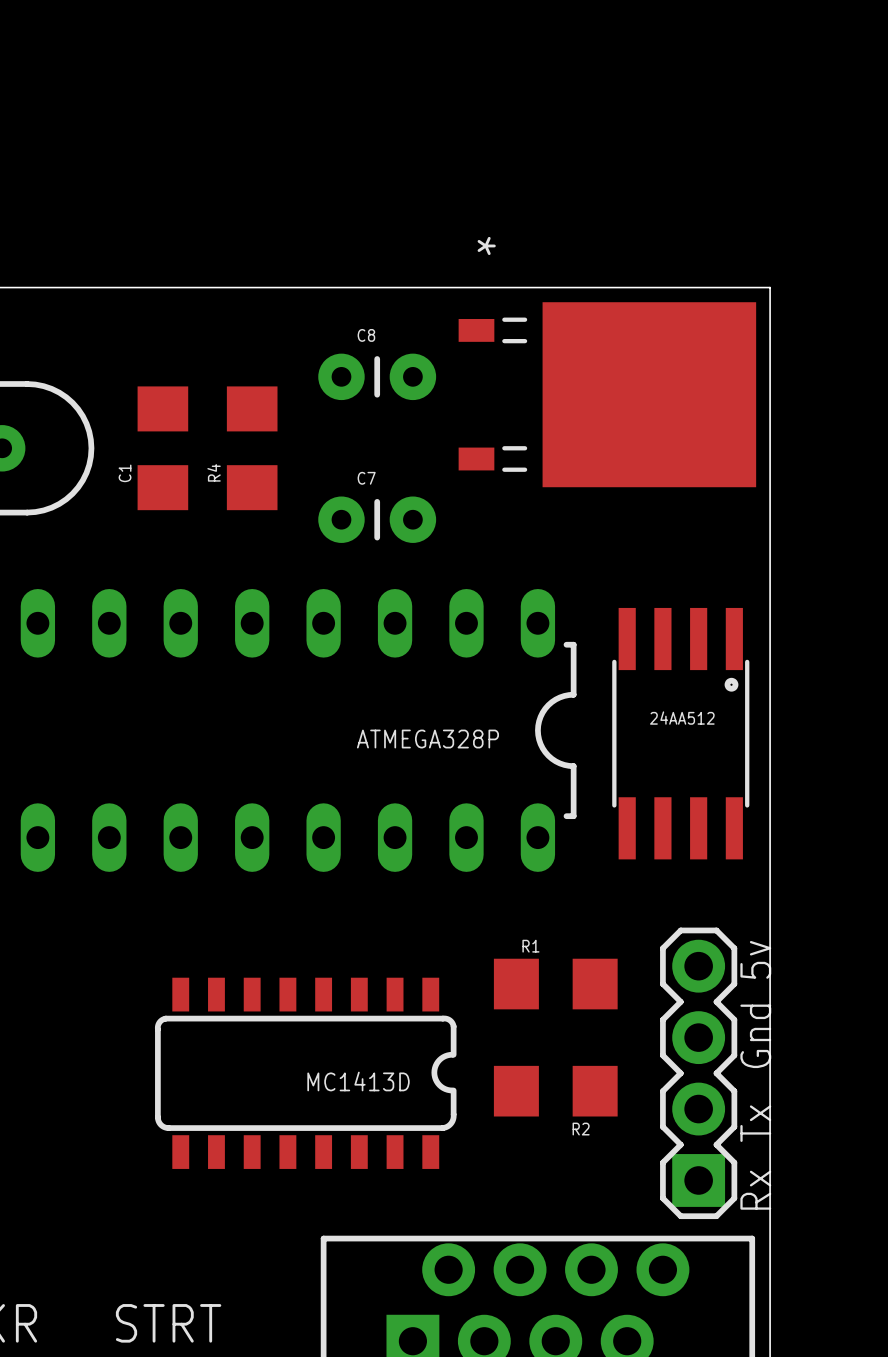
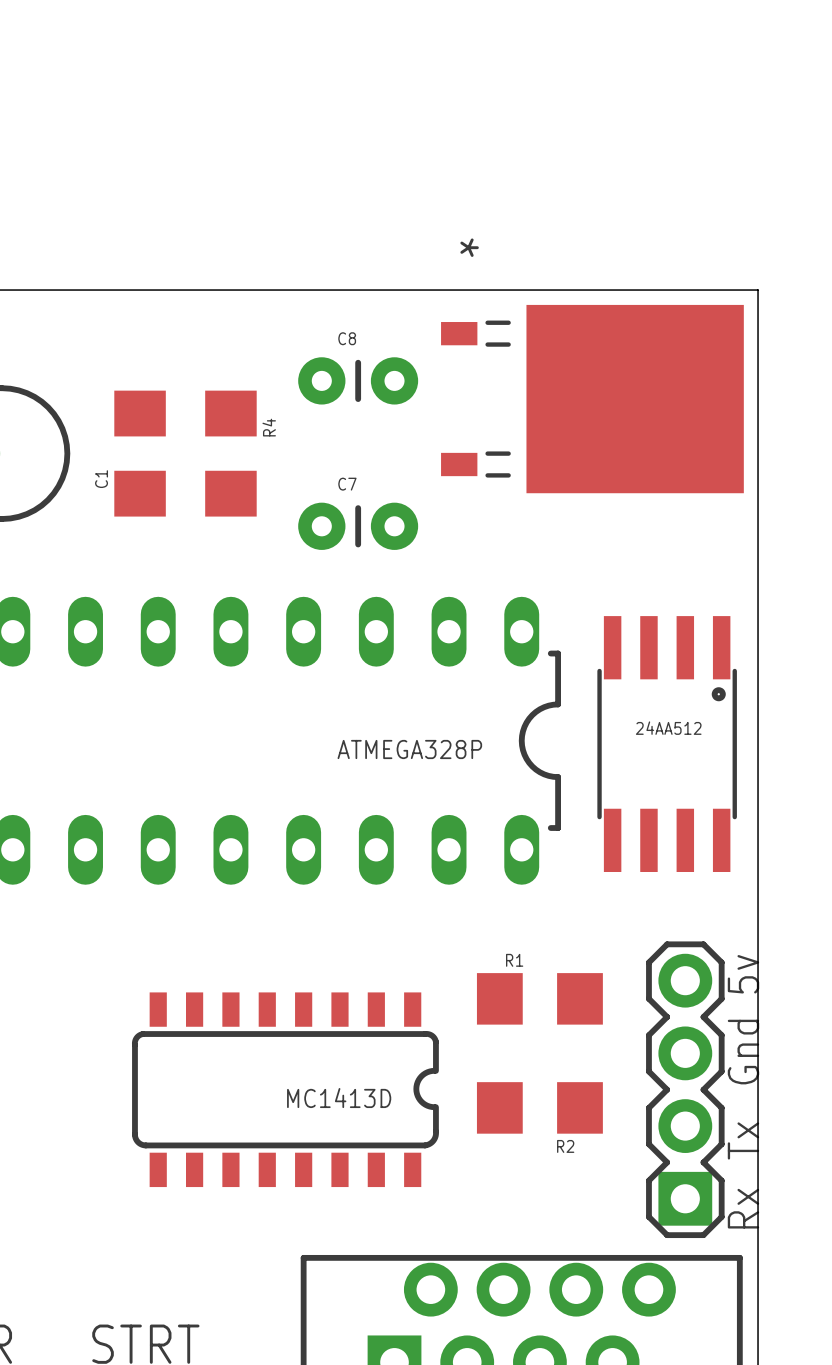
R4 name position: R4 (214, 472) -> R4 (269, 427)

